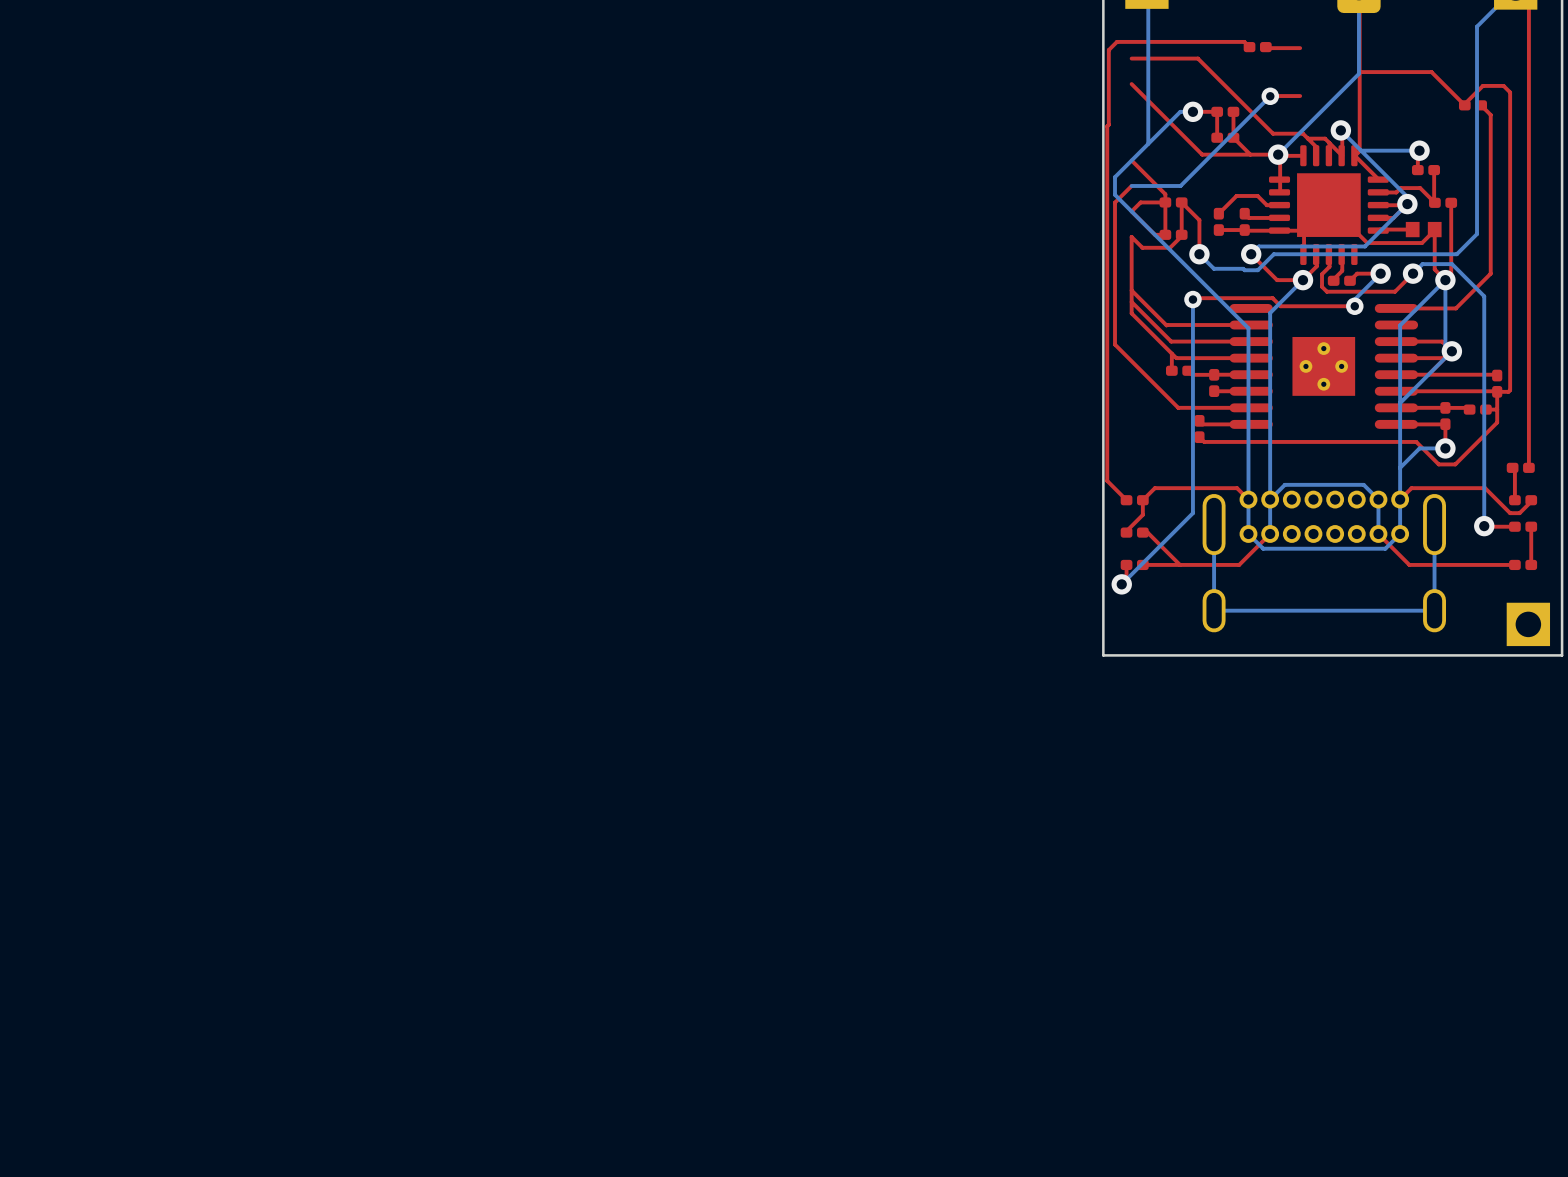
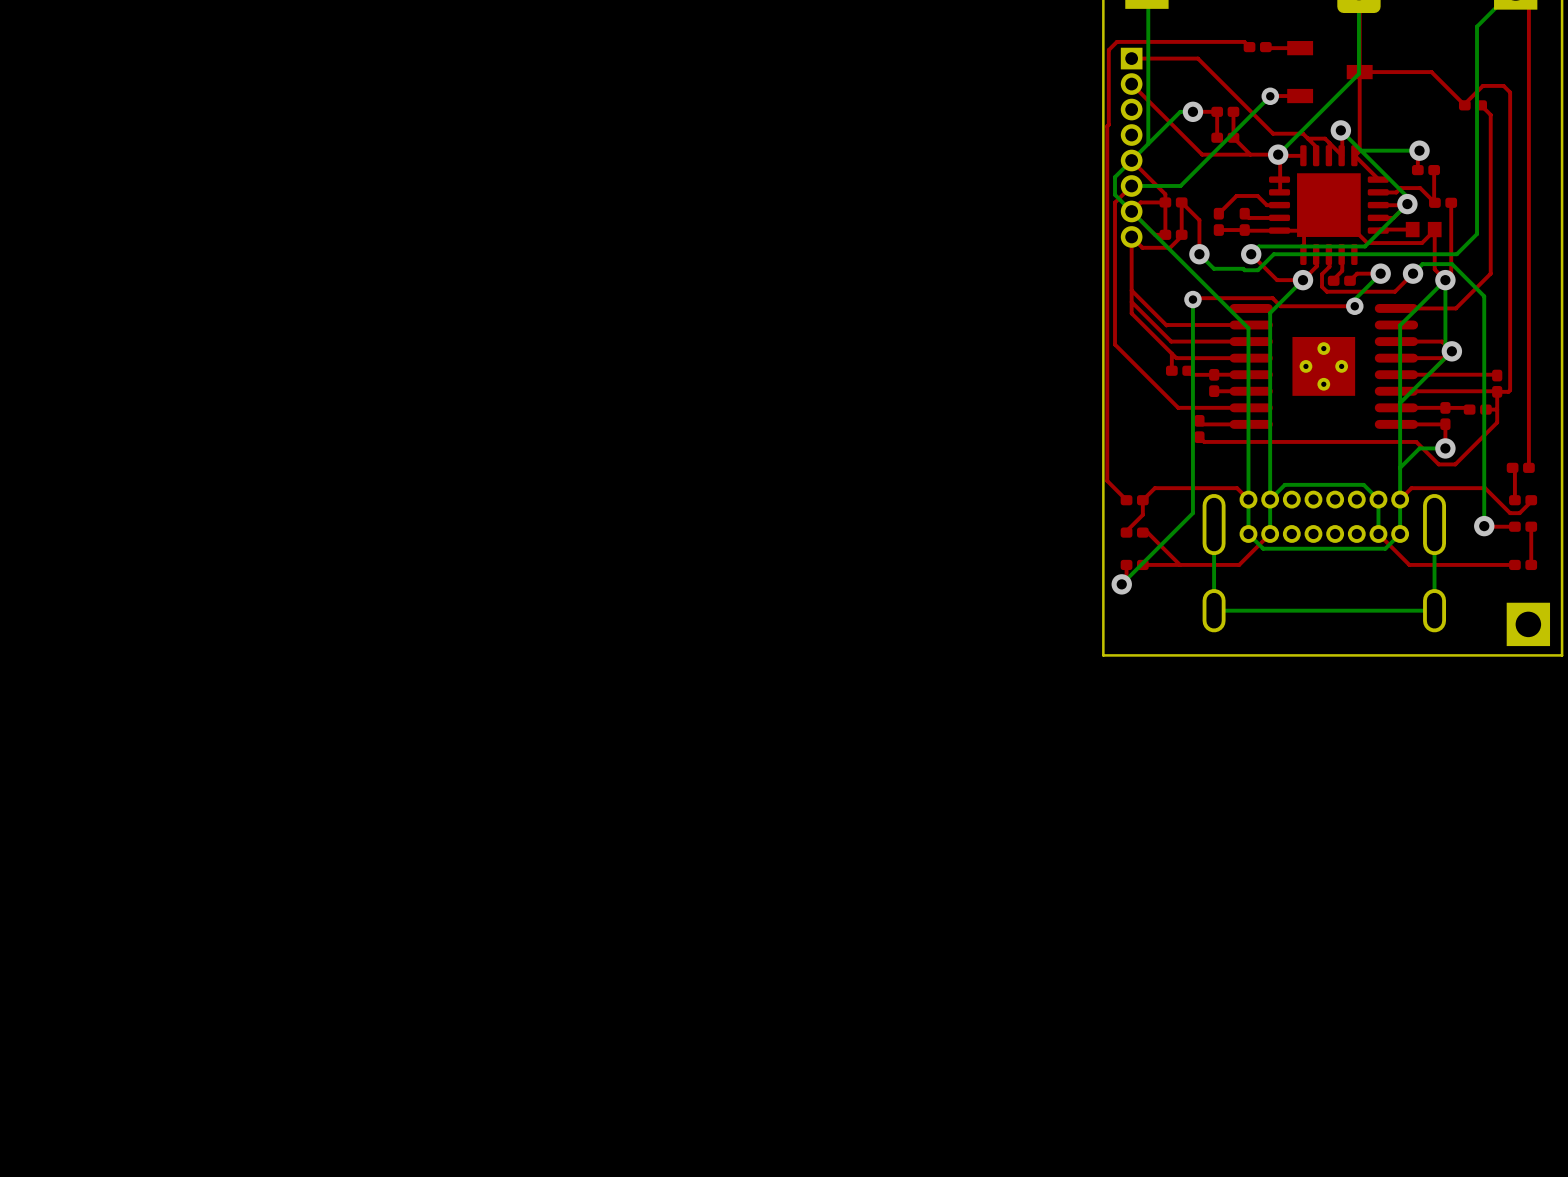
part: none -> (1329, 72)
part: none -> (1131, 147)

